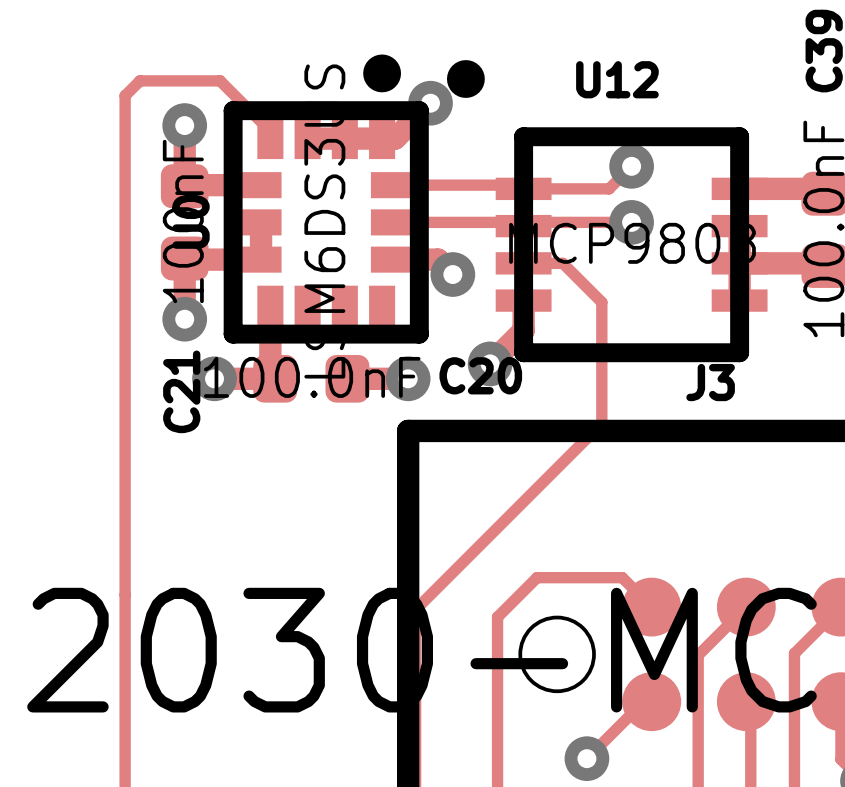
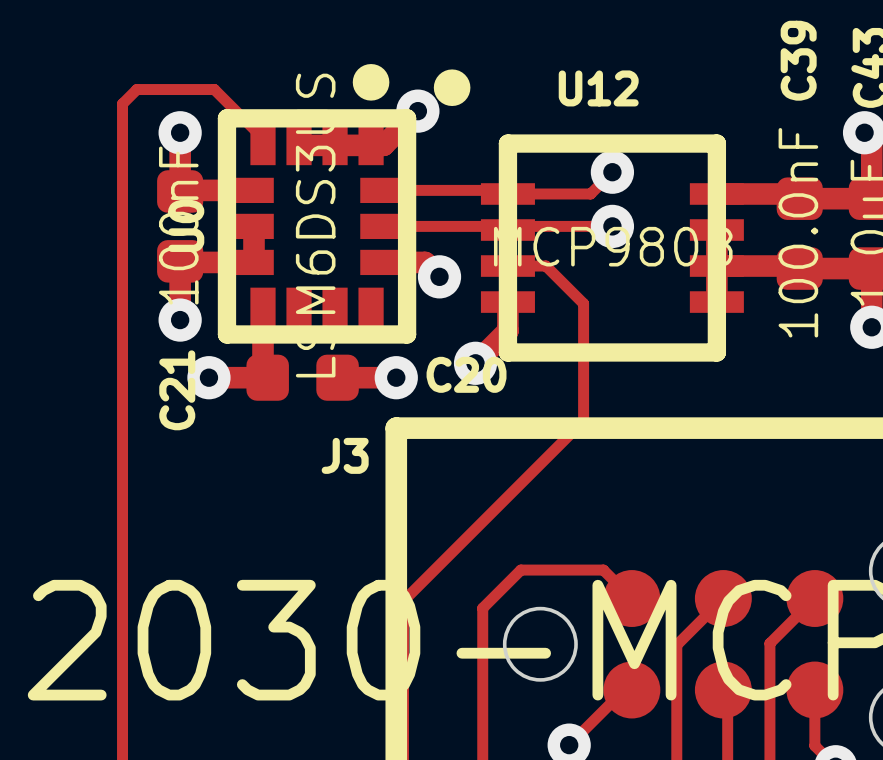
C20 value: 100.0nF (312, 377) -> none
J3 name position: J3 (710, 382) -> J3 (345, 455)

